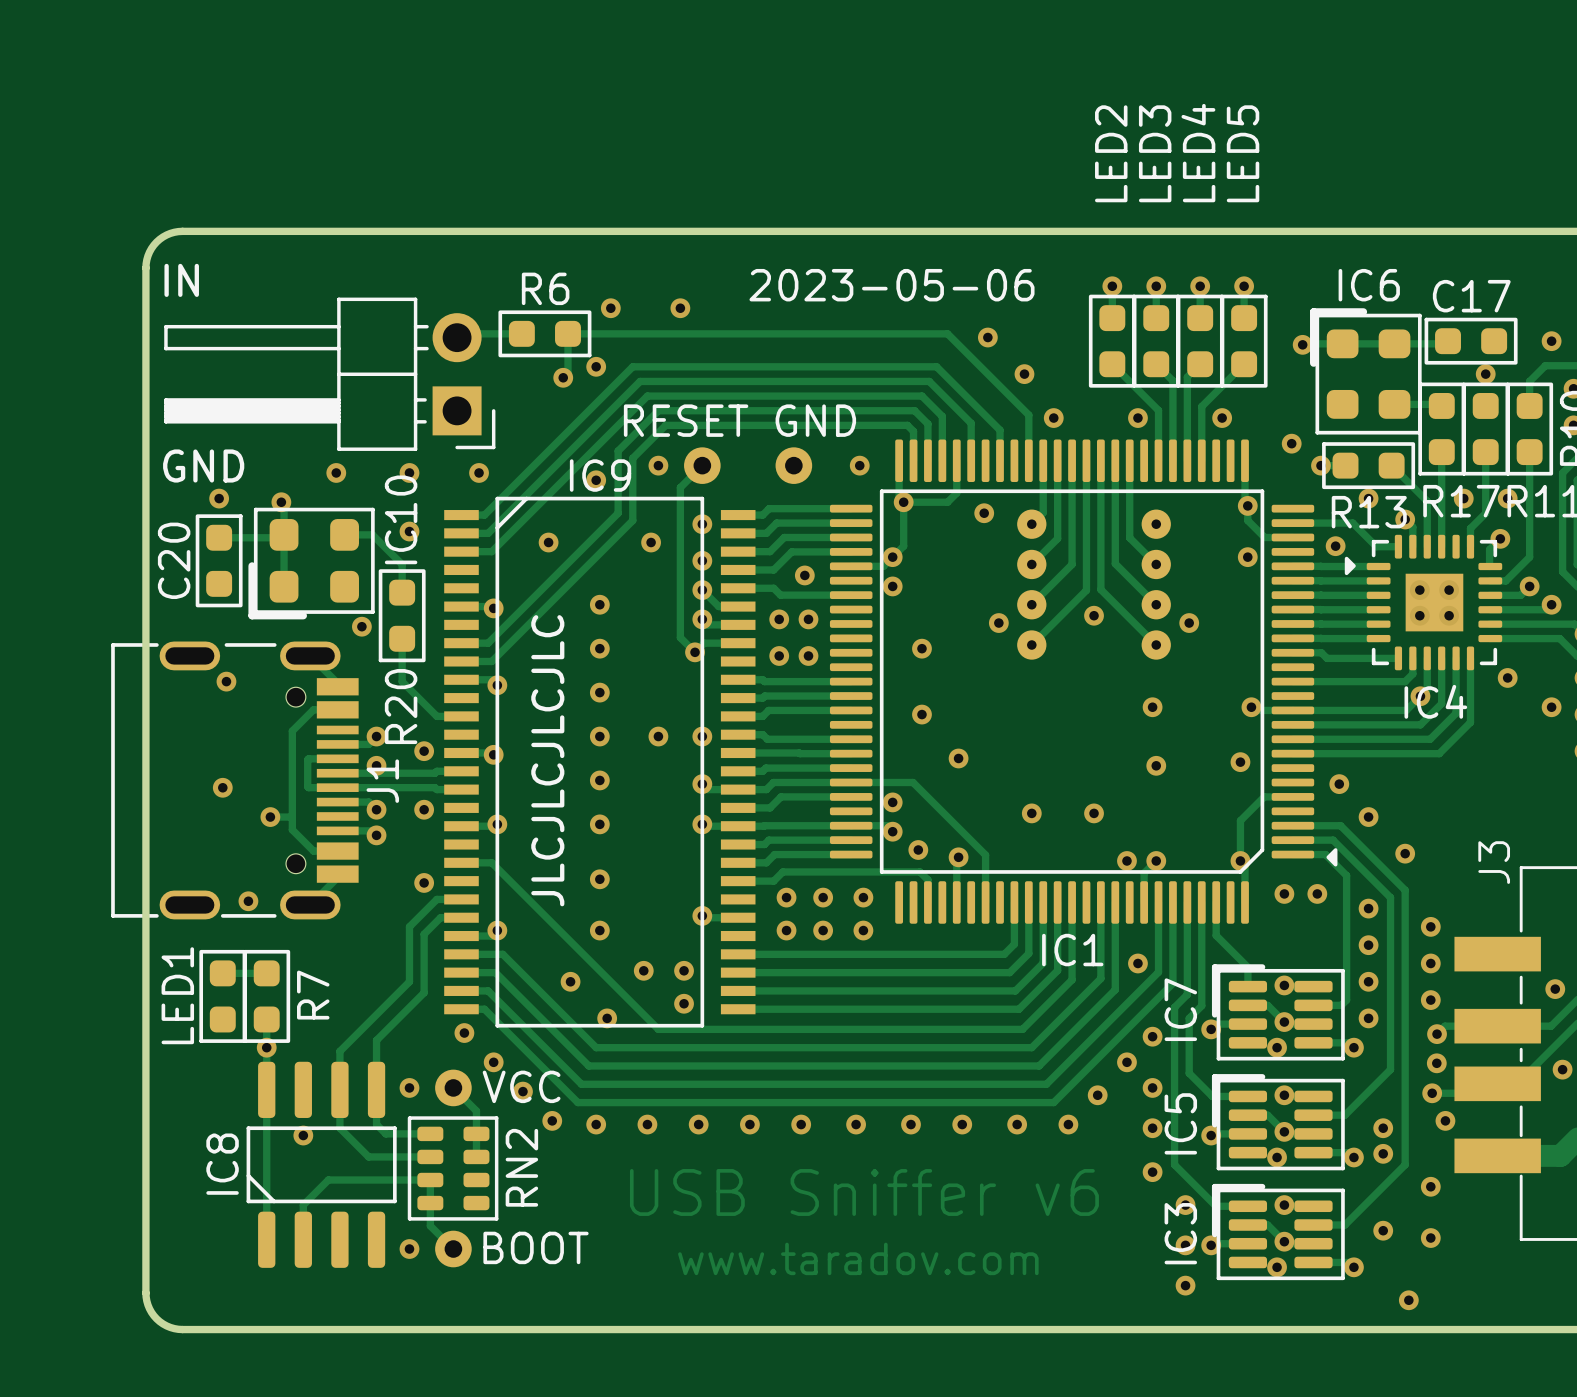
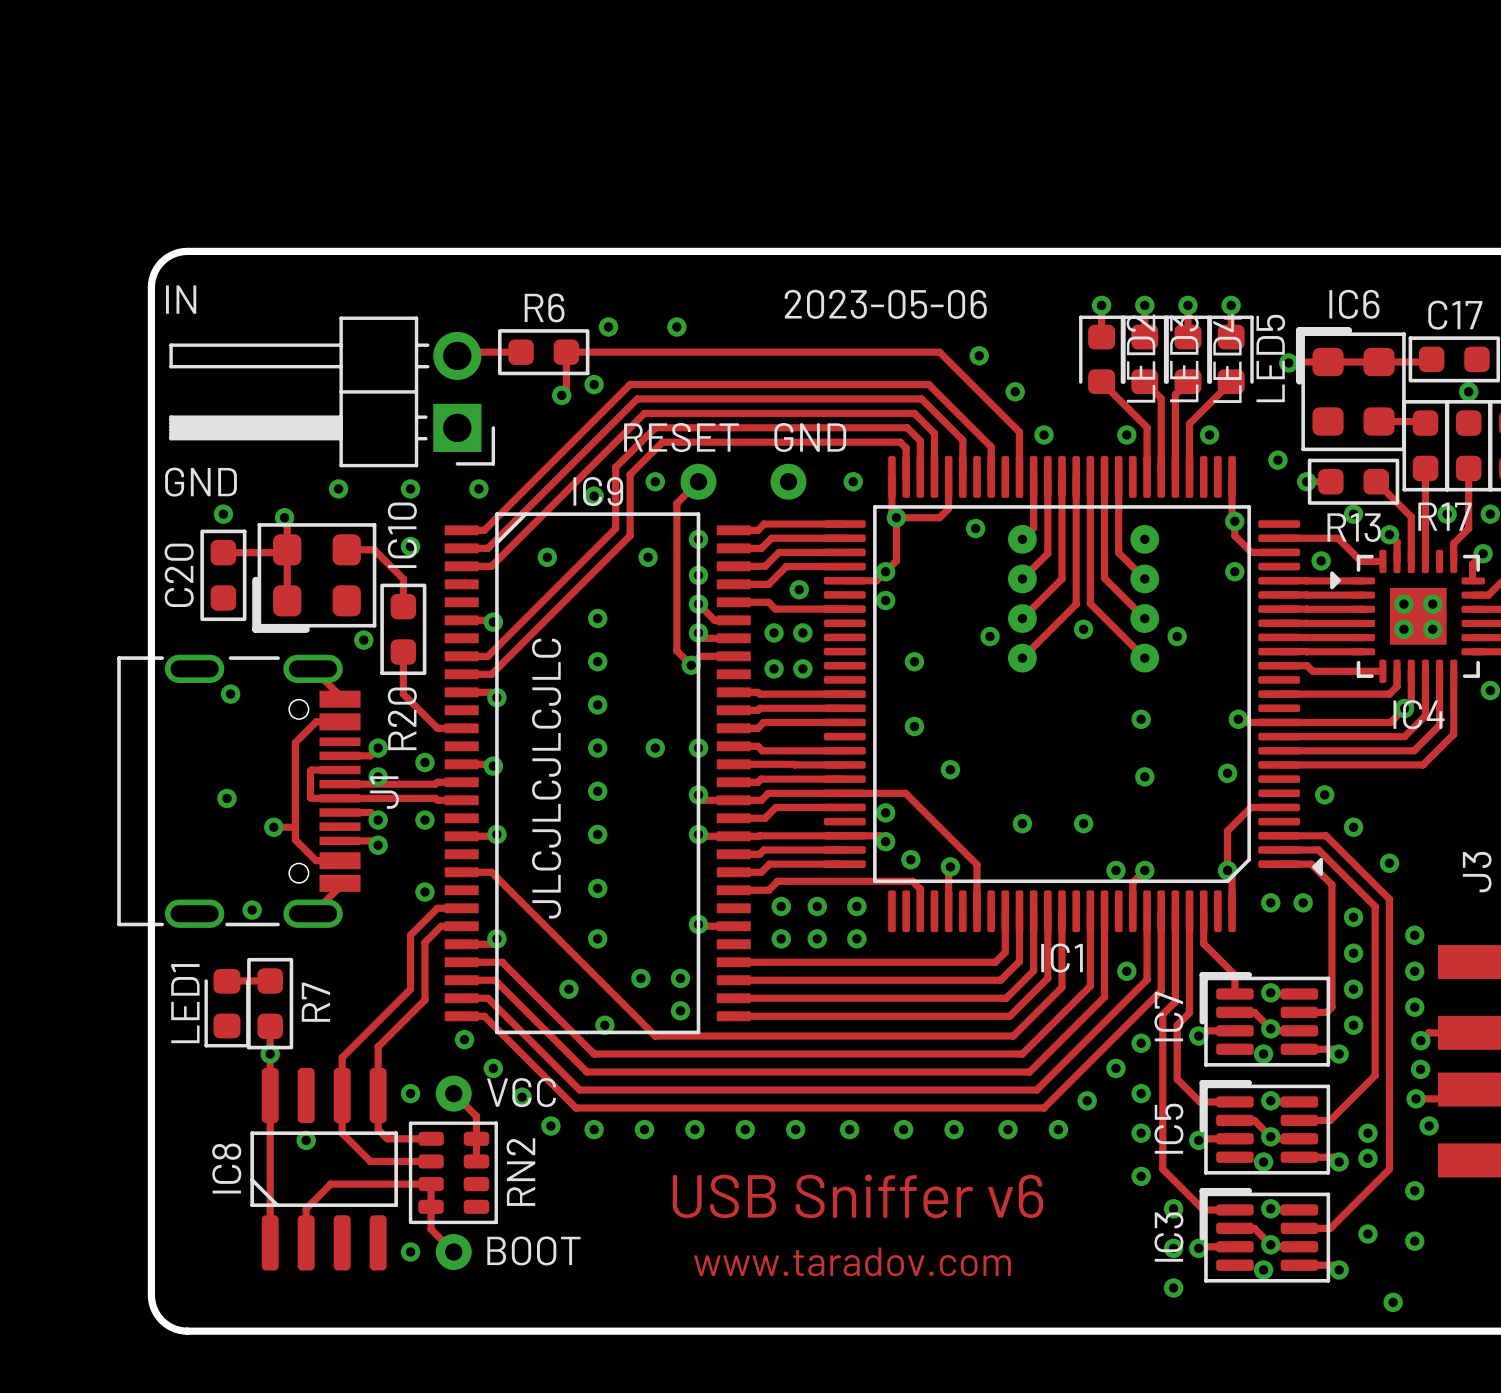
LED2 name position: LED2 (1111, 153) -> LED2 (1140, 358)
LED3 name position: LED3 (1155, 153) -> LED3 (1184, 358)
LED4 name position: LED4 (1198, 153) -> LED4 (1227, 358)
LED5 name position: LED5 (1243, 153) -> LED5 (1270, 358)
LED2 footprint: [1088, 294, 1136, 388] -> [1079, 315, 1125, 395]
LED3 footprint: [1132, 294, 1180, 388] -> [1122, 315, 1168, 395]
LED4 footprint: [1176, 294, 1224, 388] -> [1165, 315, 1211, 395]
LED5 footprint: [1220, 294, 1268, 388] -> [1208, 315, 1254, 395]
LED1 footprint: [199, 949, 247, 1043] -> [204, 968, 250, 1048]

